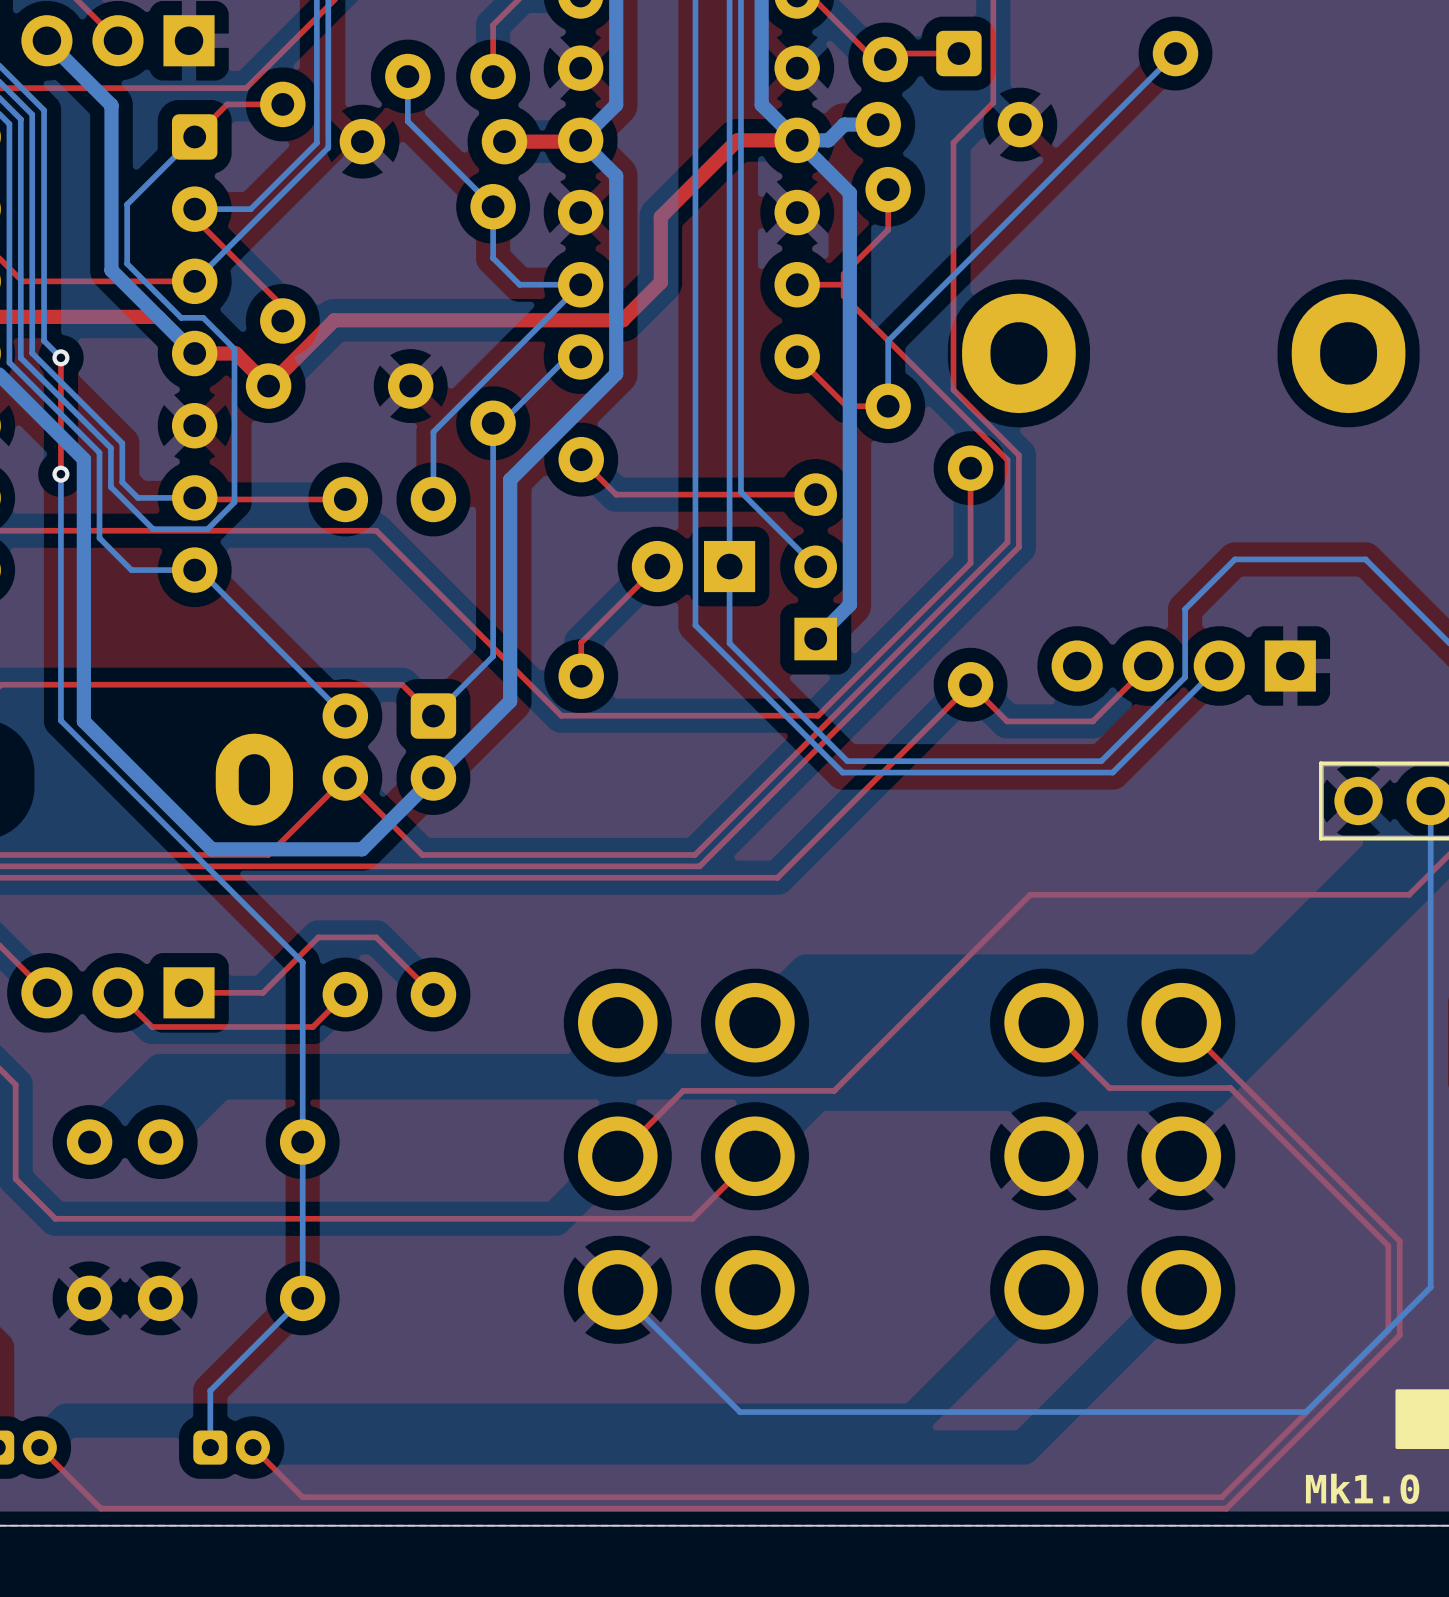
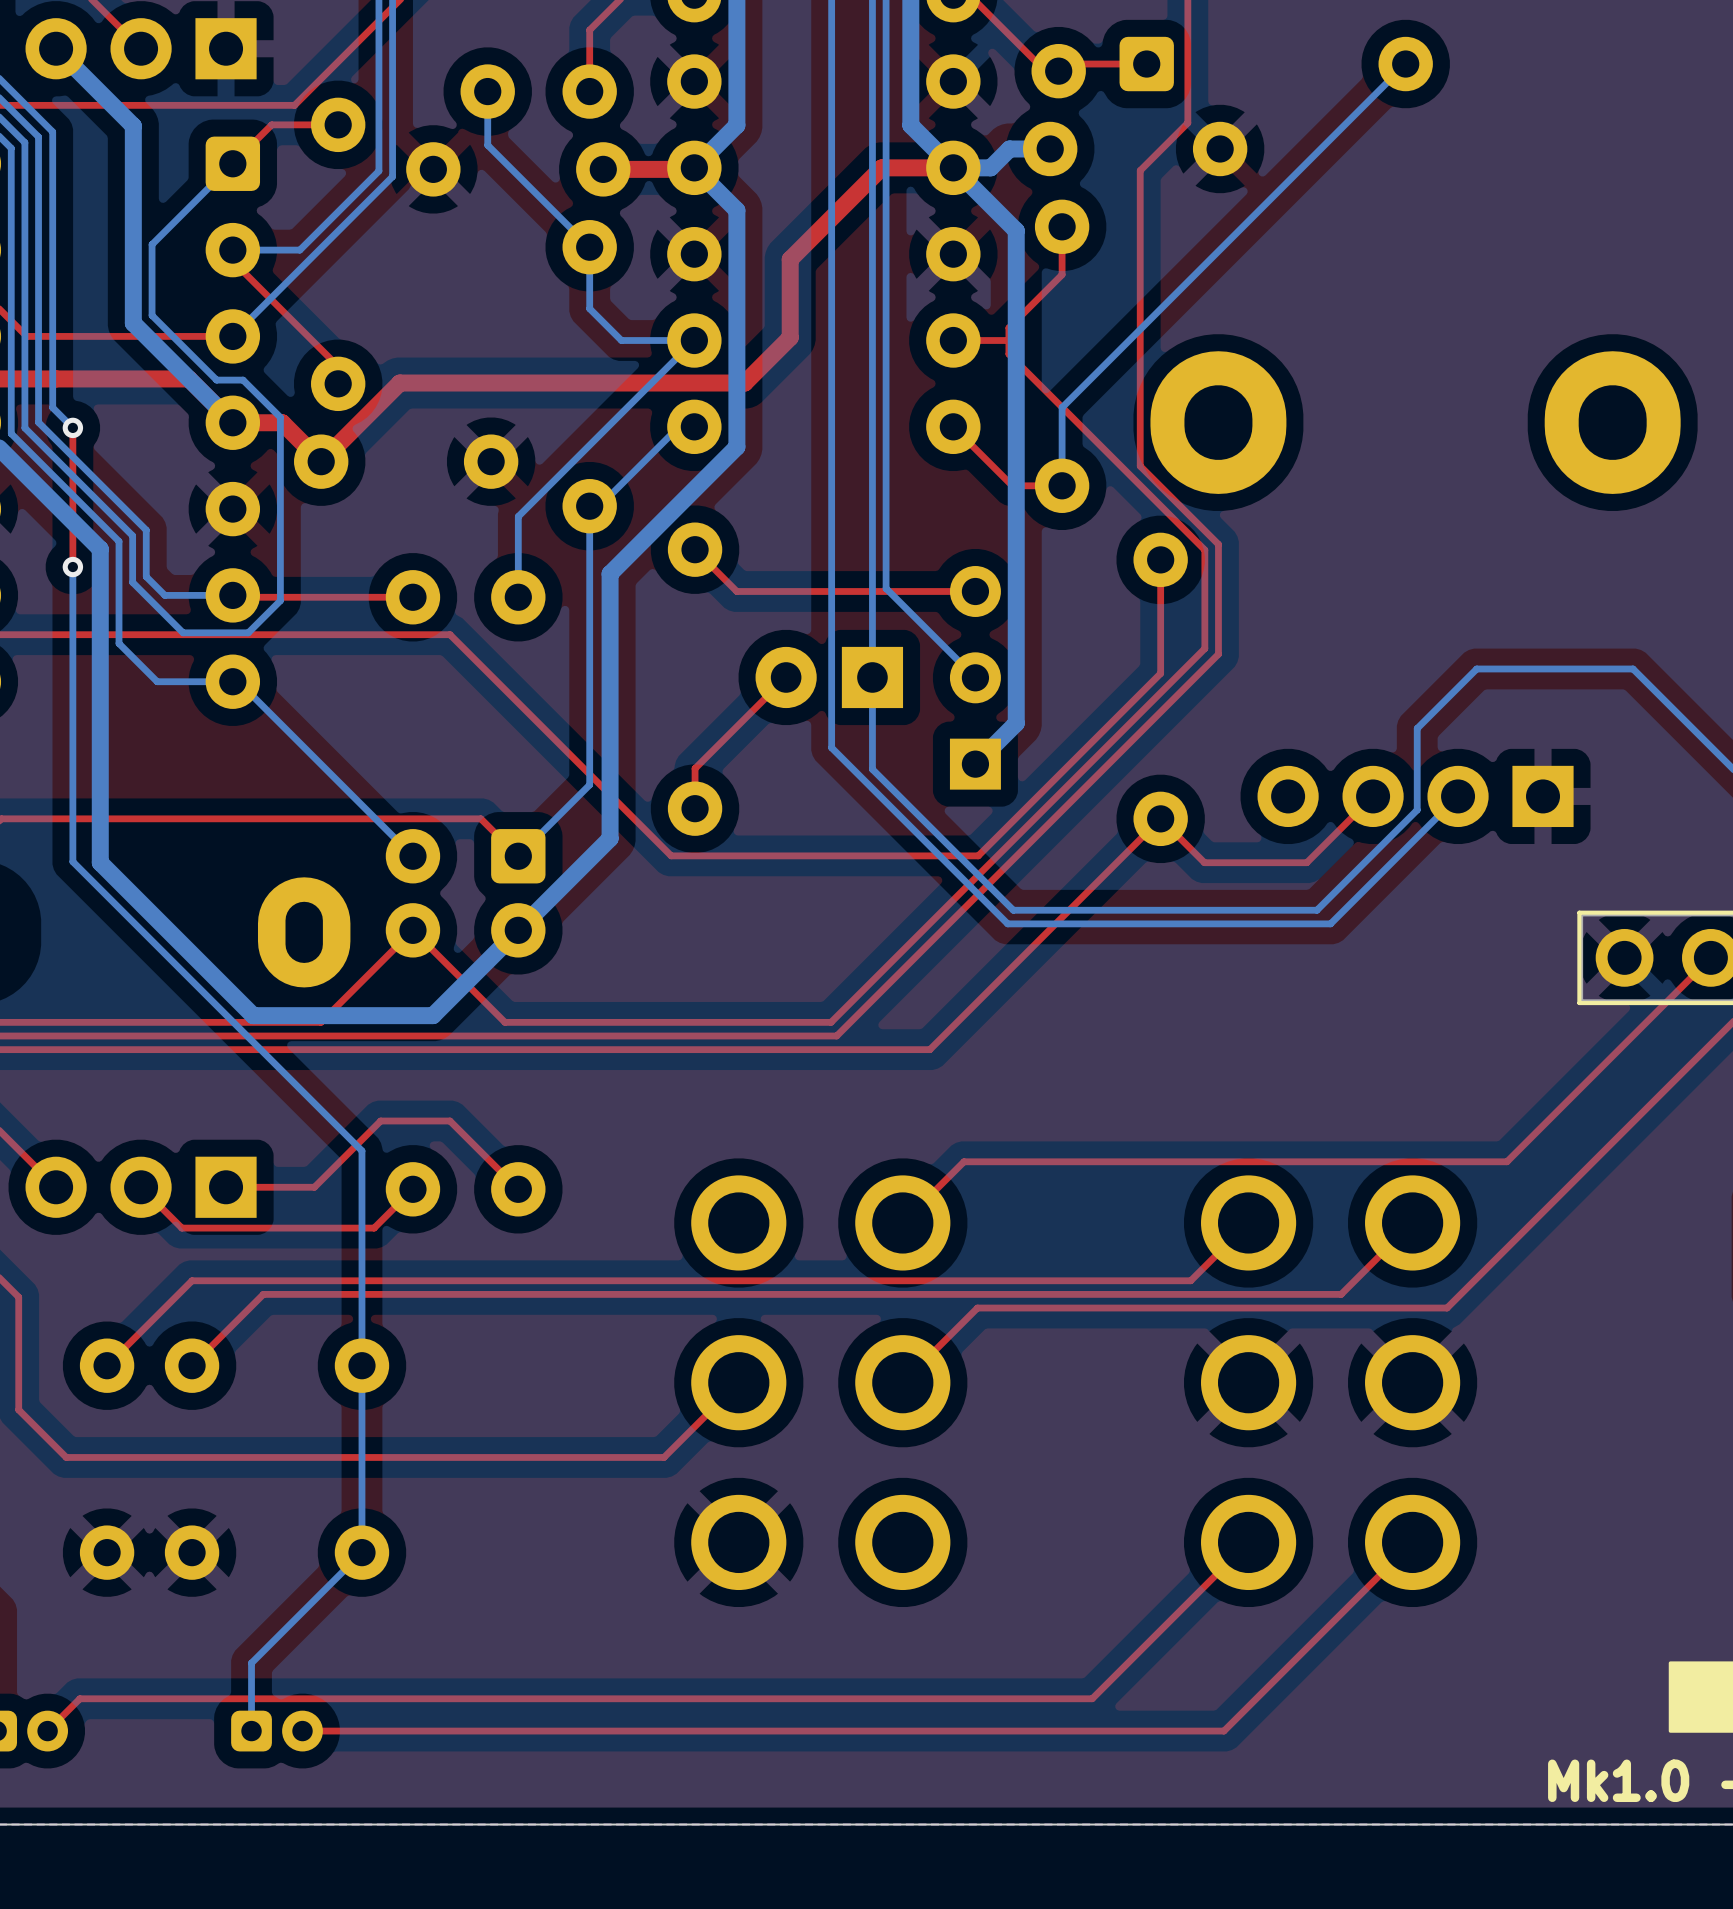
bottom track: (1430, 801) (1430, 1287) (1305, 1412) (740, 1412) (617, 1289) -> none
top track: none -> (1710, 957) (1506, 1161) (963, 1161) (902, 1222)
top track: (1409, 894) (1030, 894) (834, 1090) (683, 1090) (617, 1156) -> (1685, 1070) (1447, 1308) (977, 1308) (902, 1382)
top track: (1044, 1022) (1109, 1088) (1230, 1088) (1388, 1245) (1388, 1330) (1221, 1497) (302, 1497) (252, 1447) -> (1412, 1542) (1223, 1731) (302, 1731)
top track: none -> (1248, 1222) (1190, 1280) (192, 1280) (107, 1365)
top track: (1181, 1022) (1399, 1241) (1399, 1335) (1226, 1508) (100, 1508) (39, 1447) -> (1248, 1542) (1092, 1698) (79, 1698) (47, 1731)
top track: none -> (1412, 1222) (1341, 1294) (263, 1294) (192, 1365)
top track: (754, 1156) (692, 1218) (555, 1218) -> (738, 1382) (664, 1457)

